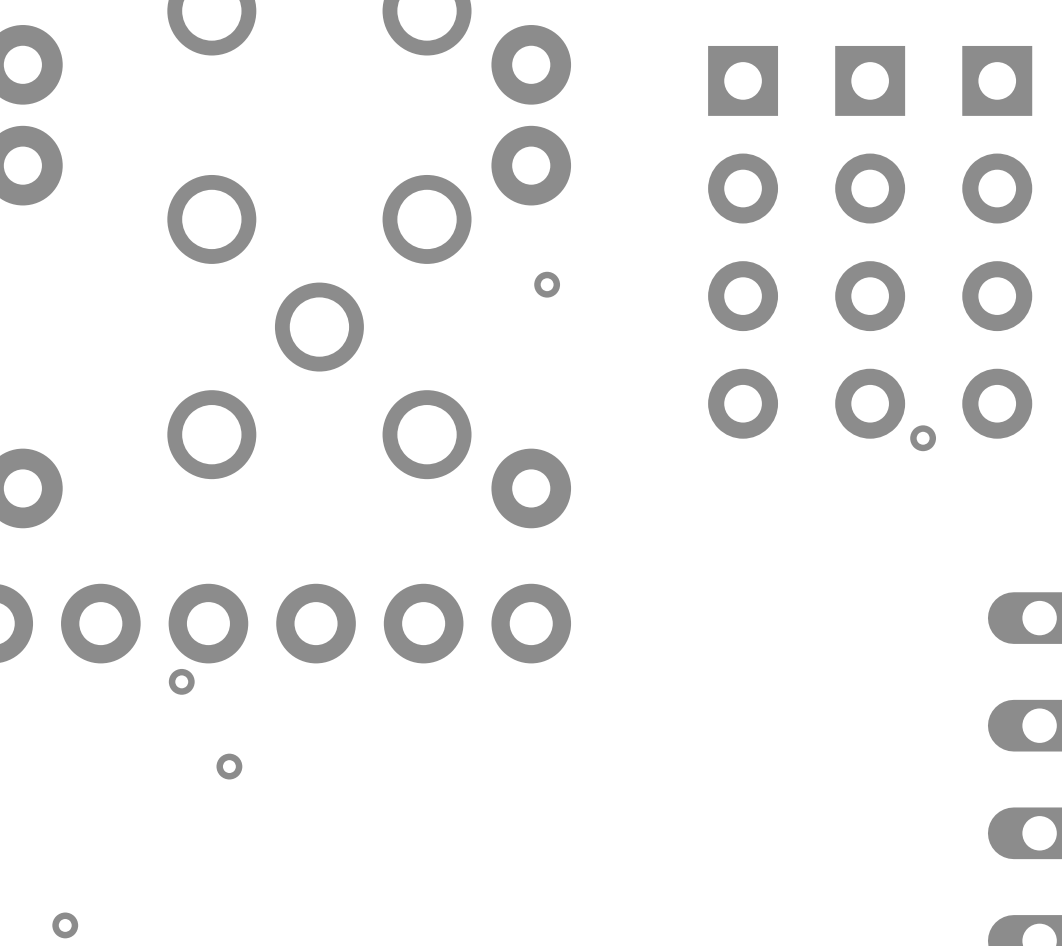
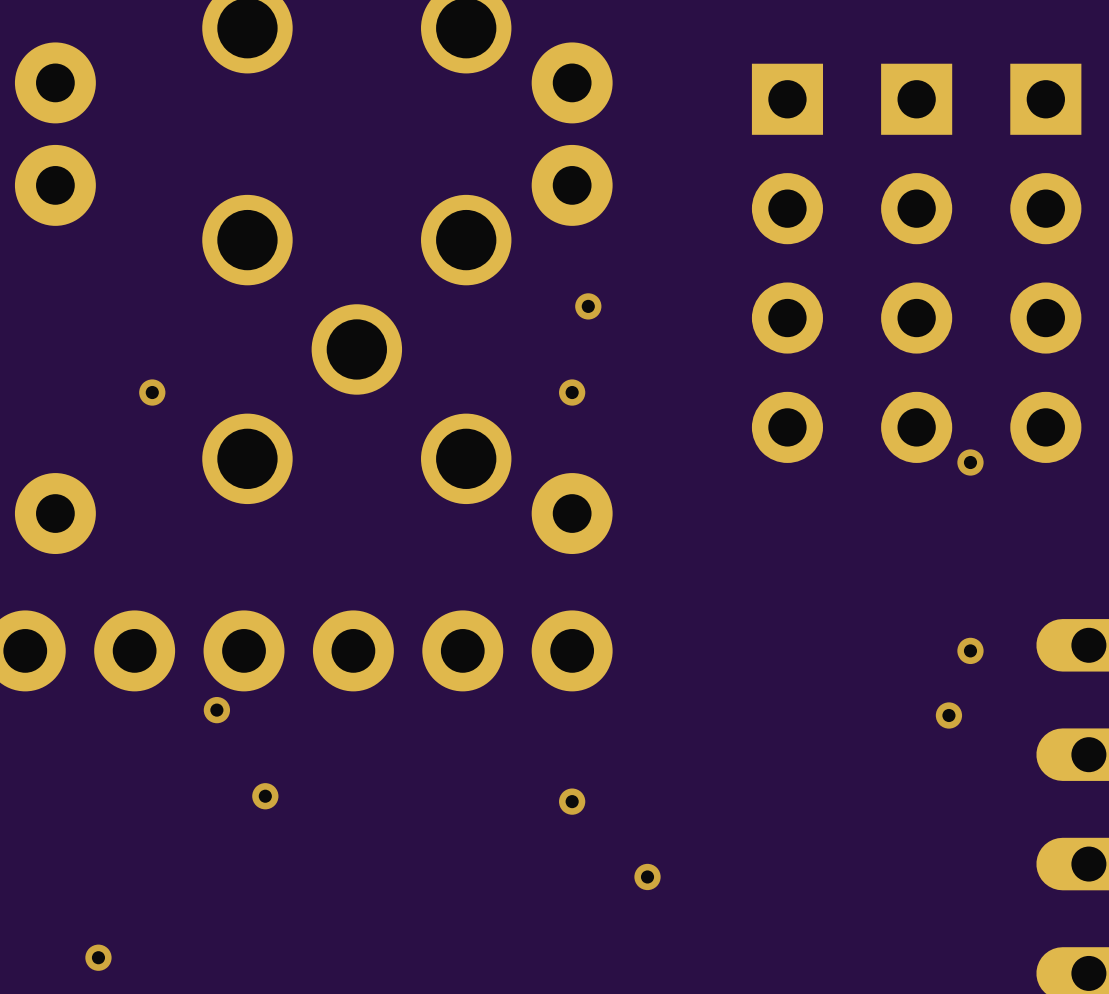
via: none -> (152, 392)
via: none -> (572, 392)
via: none -> (970, 650)
via: none -> (948, 715)
via: none -> (572, 801)
via: none -> (647, 876)

